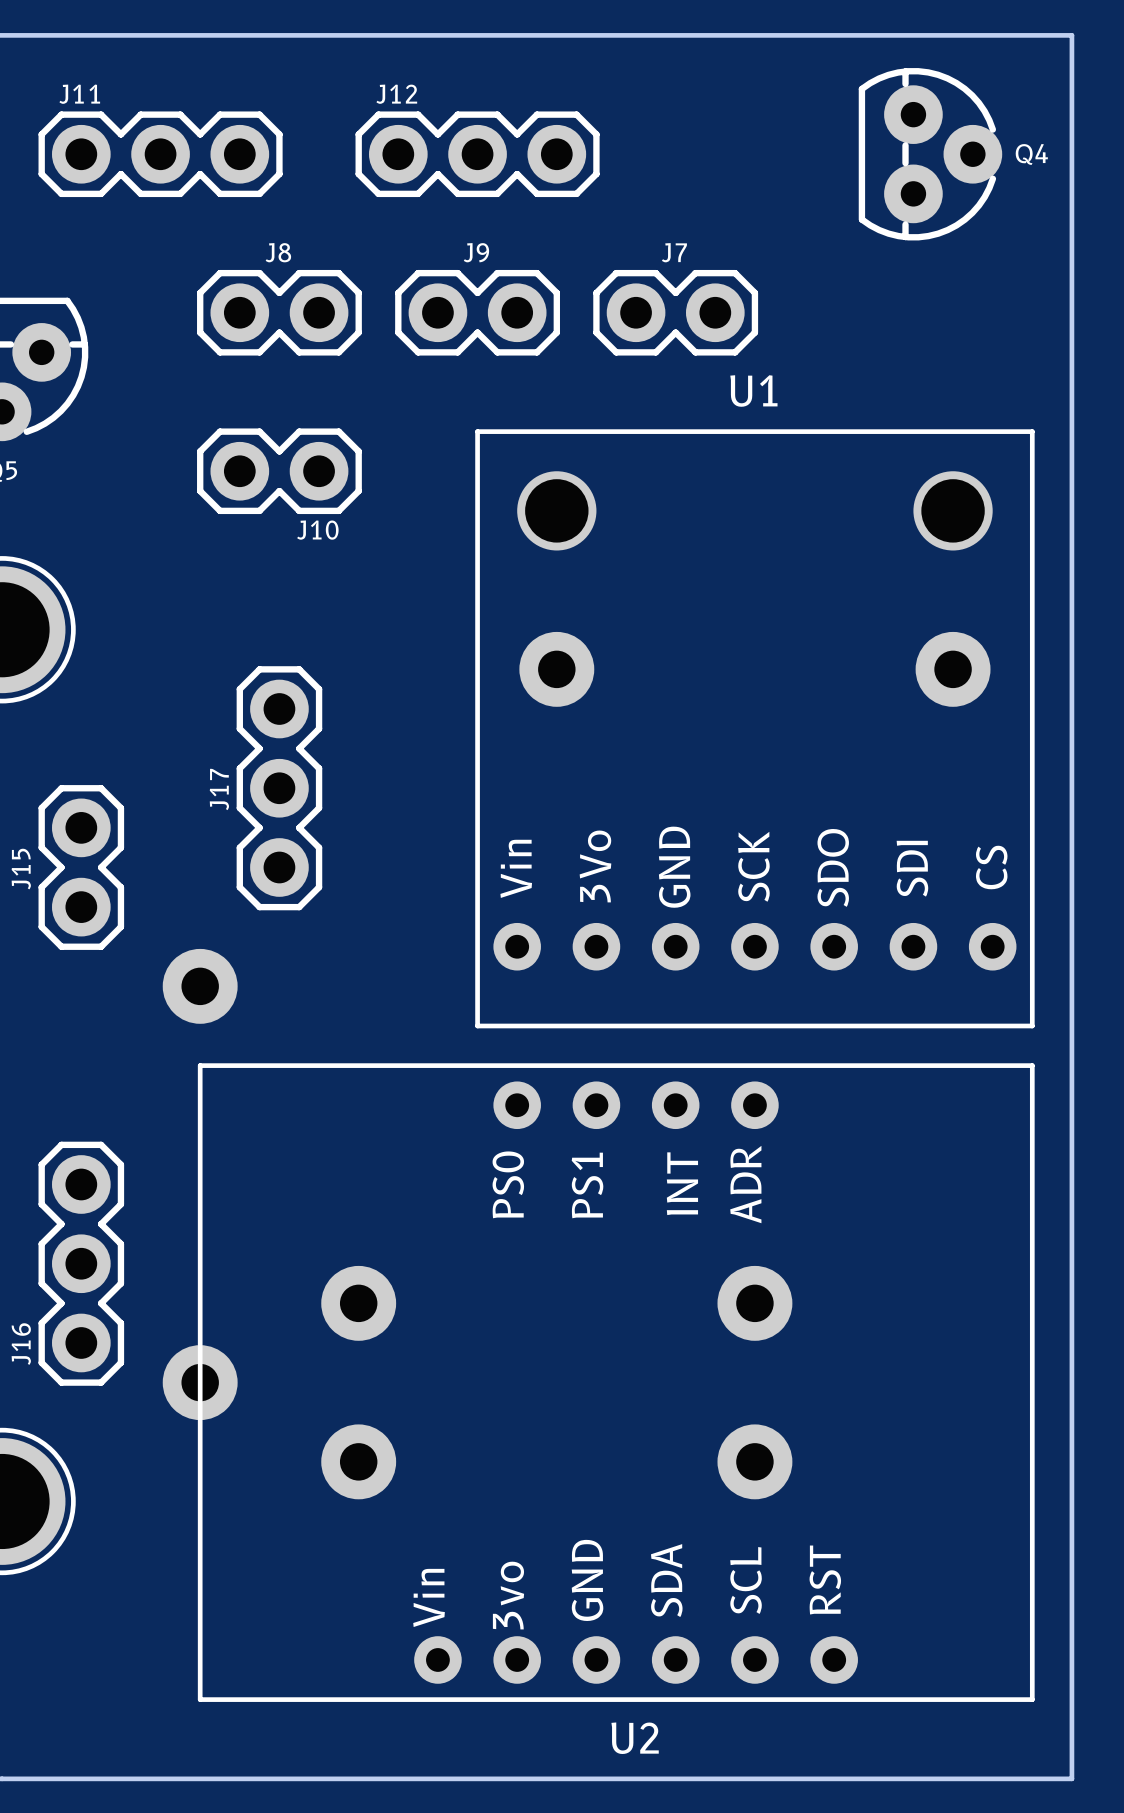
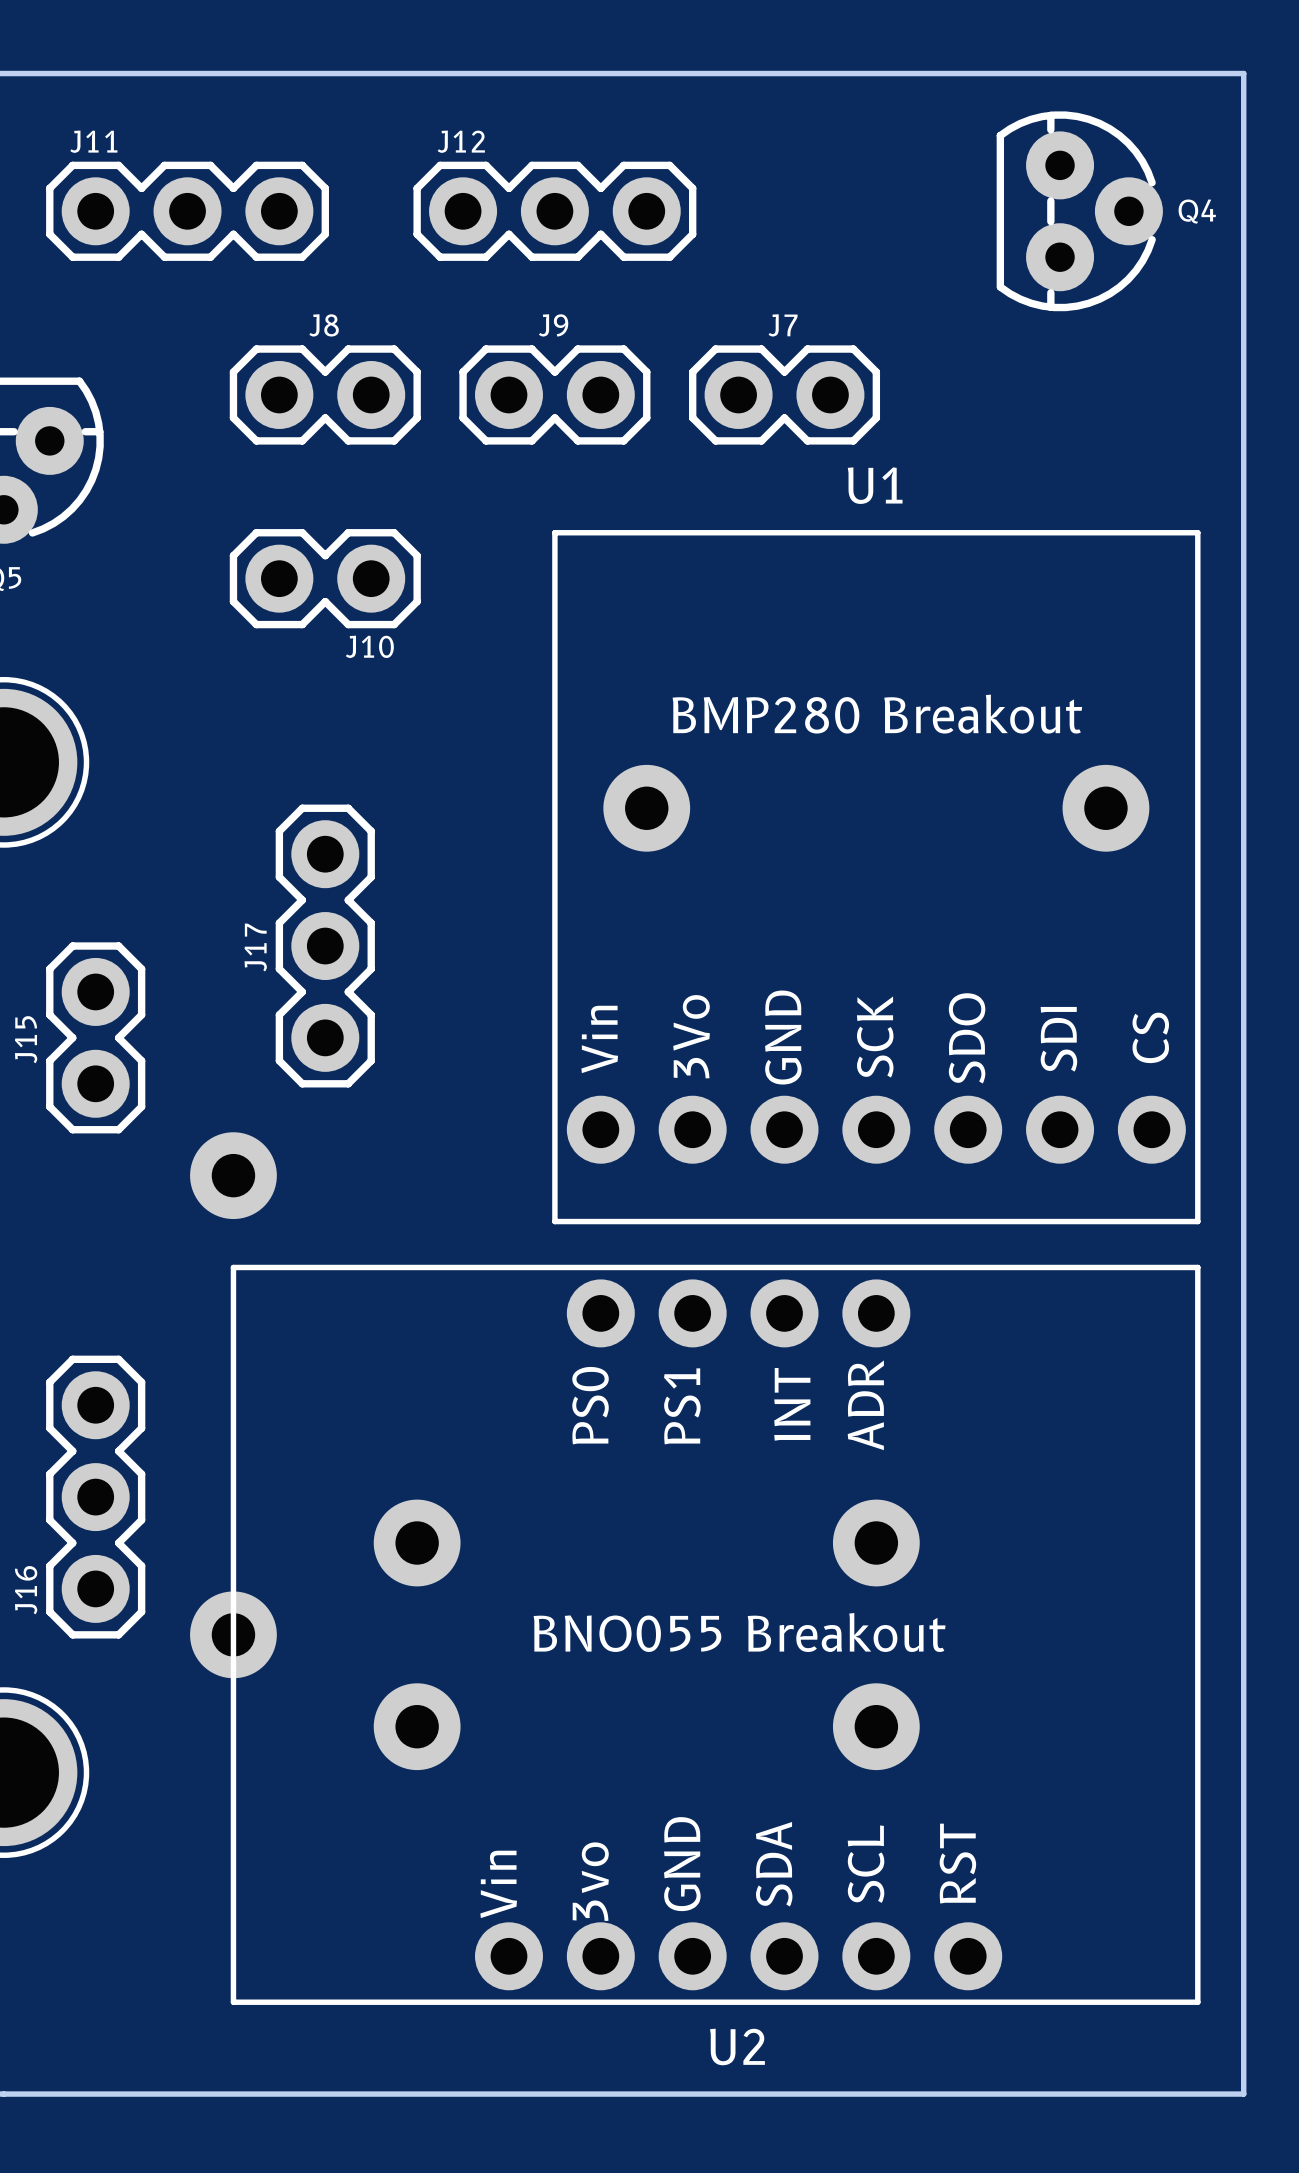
U1 footprint: [475, 429, 1035, 1029] -> [552, 530, 1201, 1225]
U1 value: none -> BMP280 Breakout (877, 714)
U2 footprint: [197, 1063, 1035, 1702] -> [230, 1264, 1201, 2005]
U2 value: none -> BNO055 Breakout (739, 1632)

